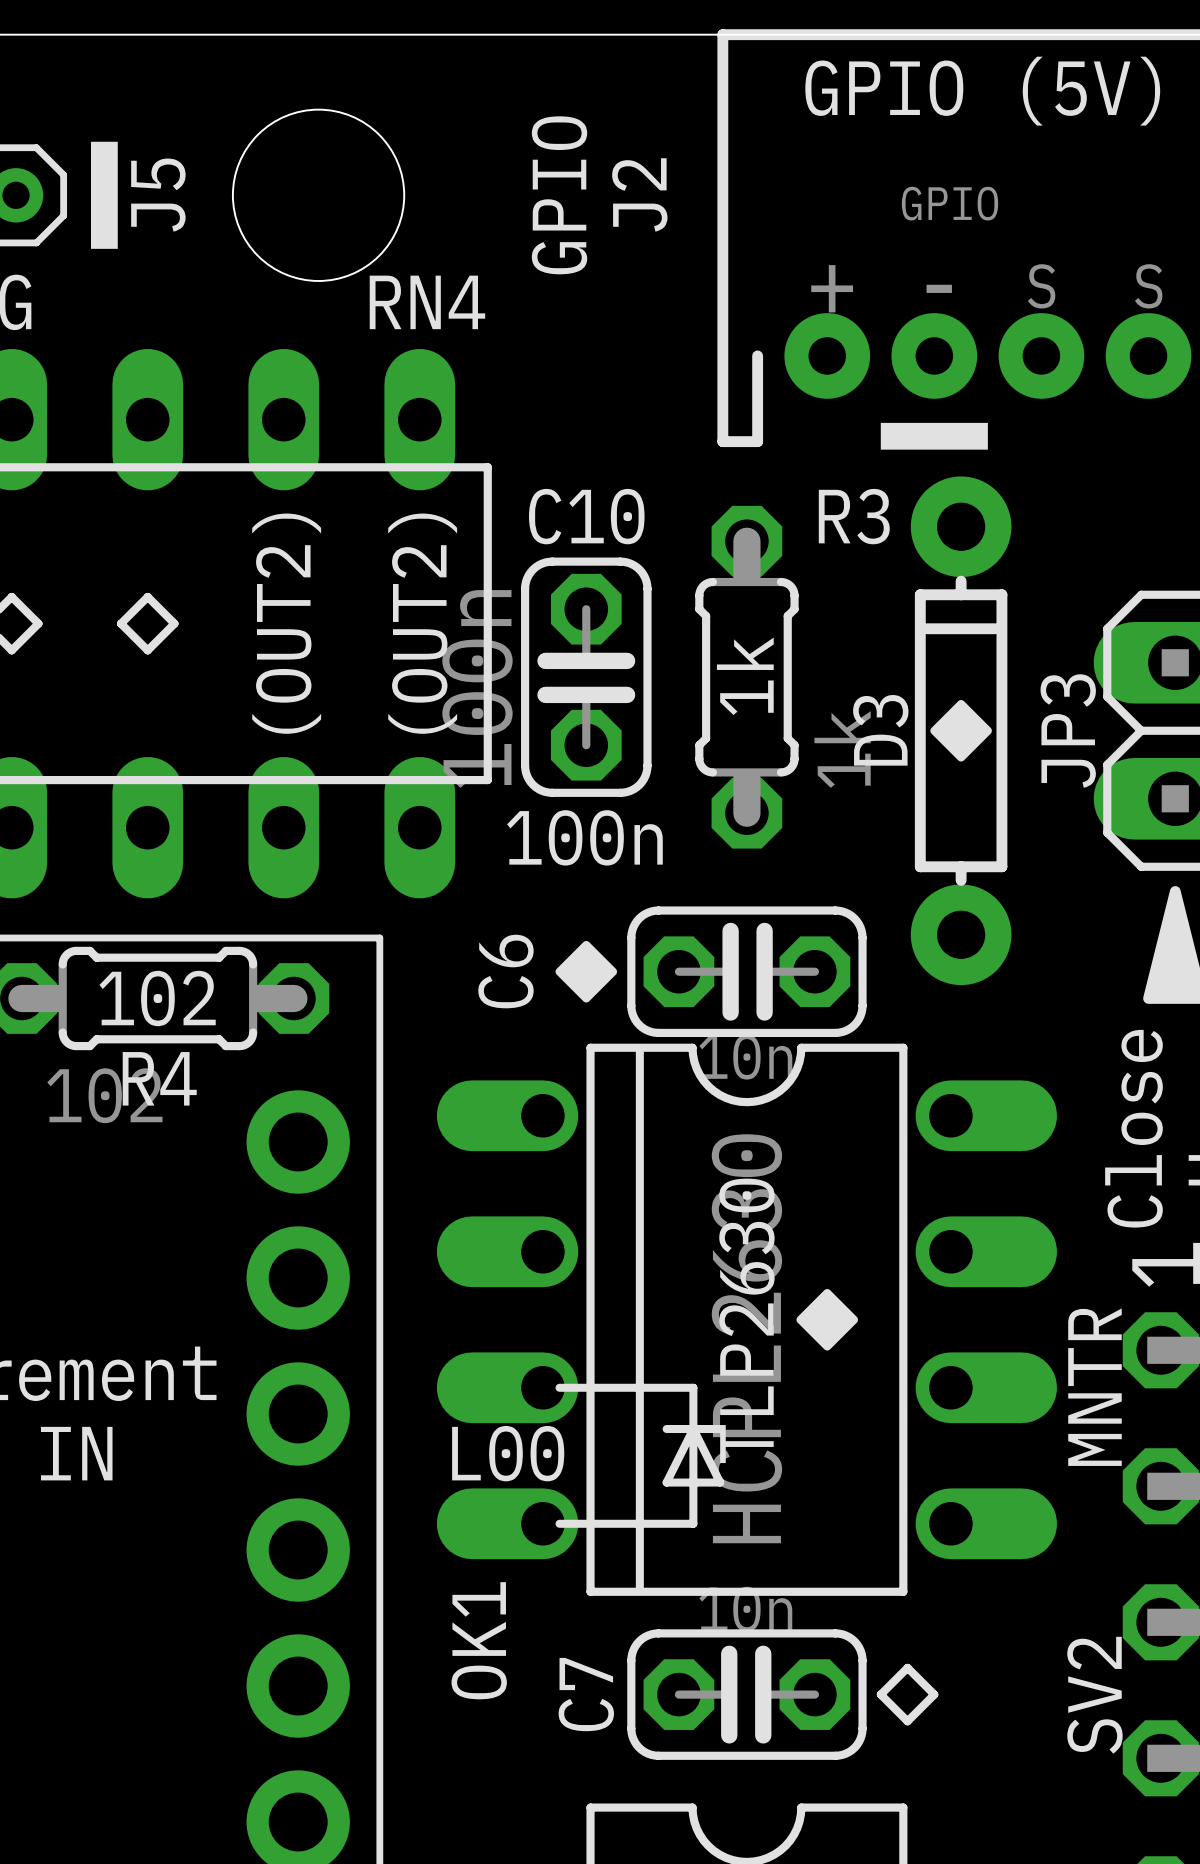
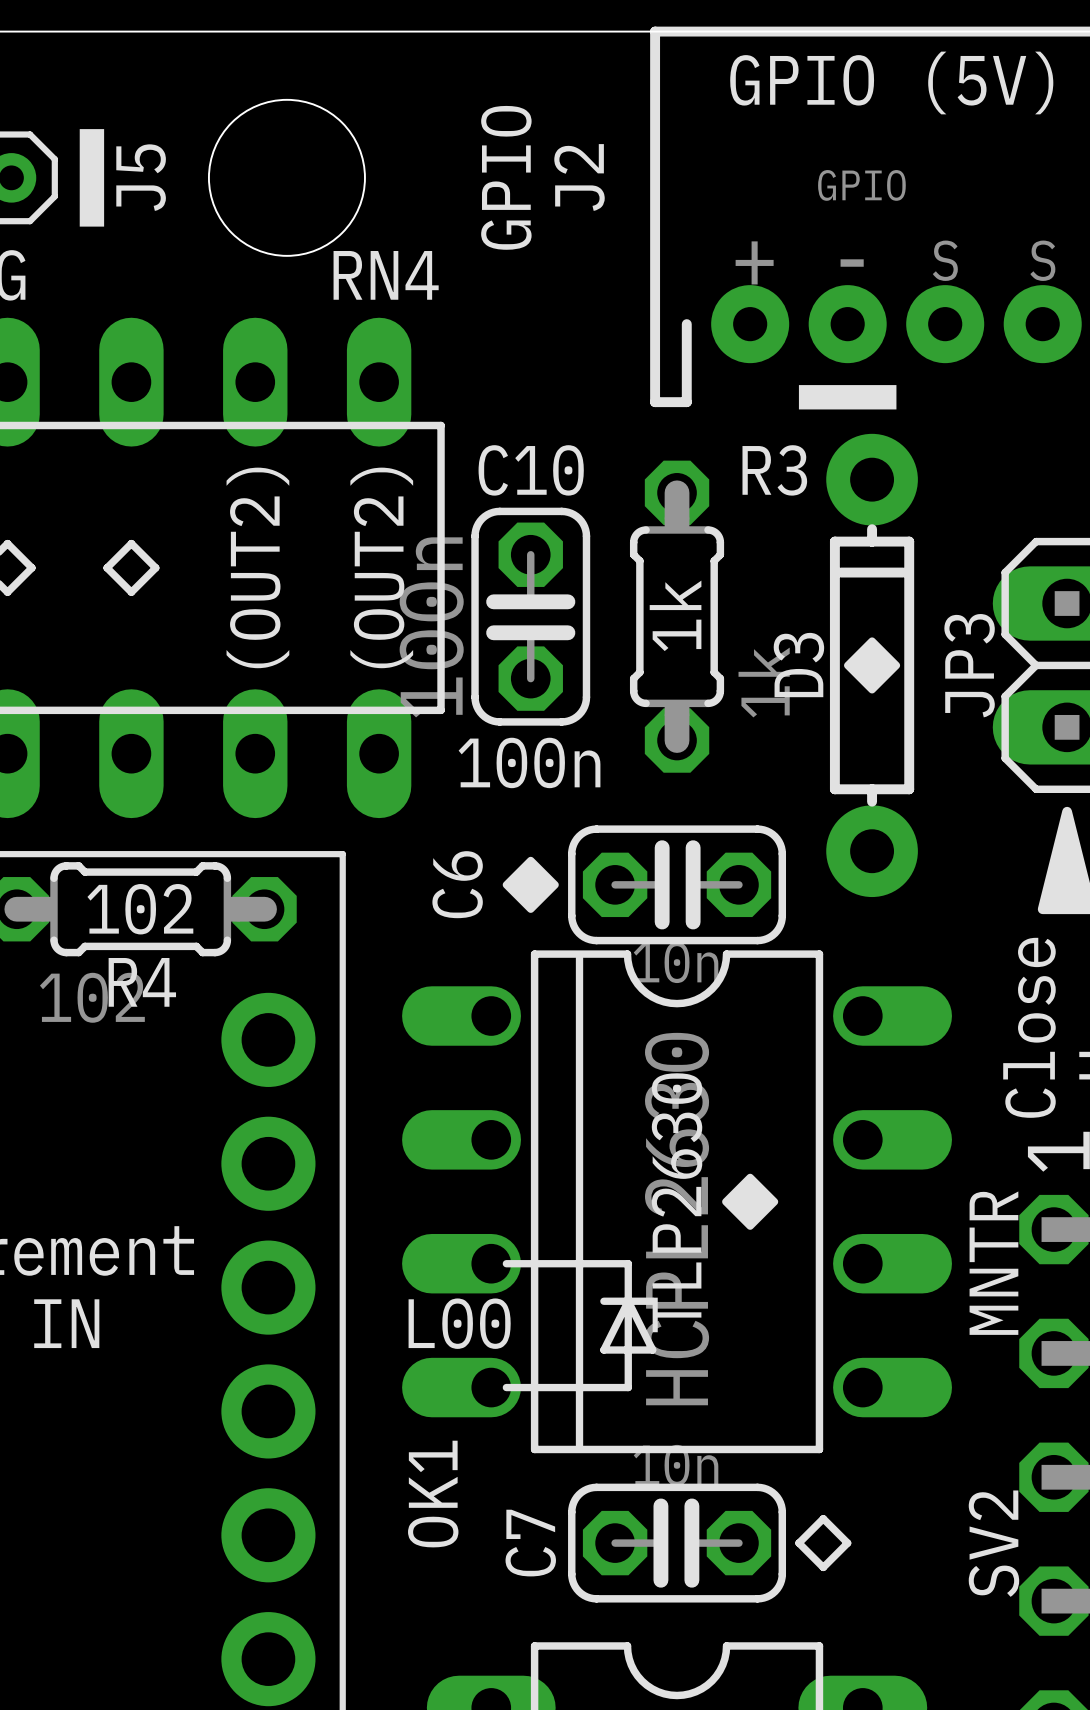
OK1 footprint: [436, 1043, 1058, 1596] -> [402, 950, 952, 1454]

